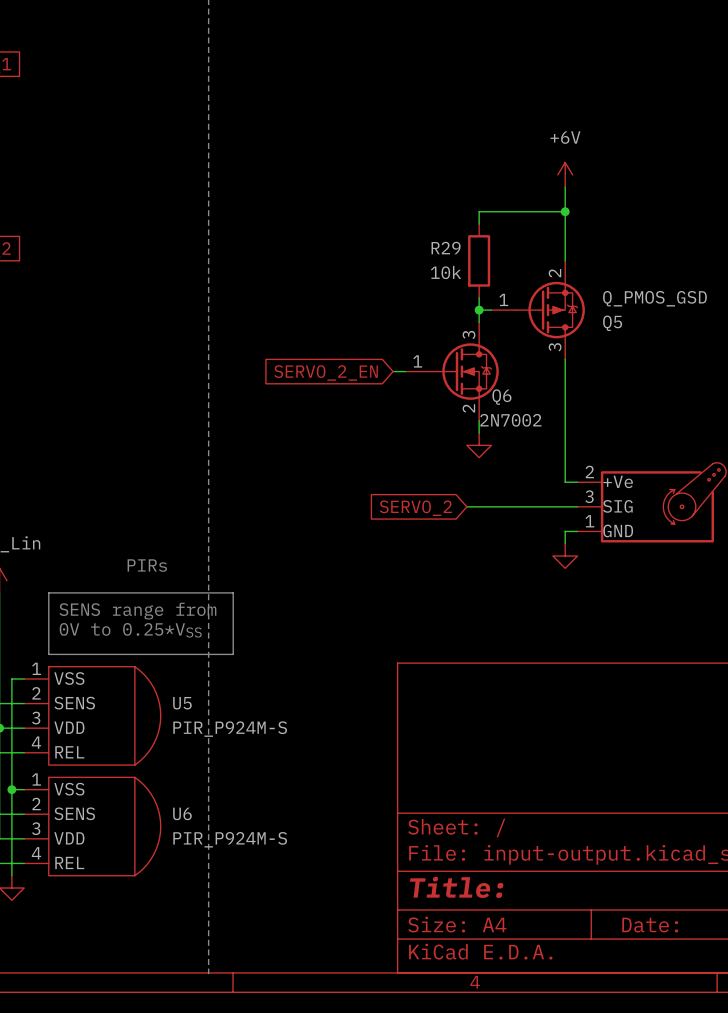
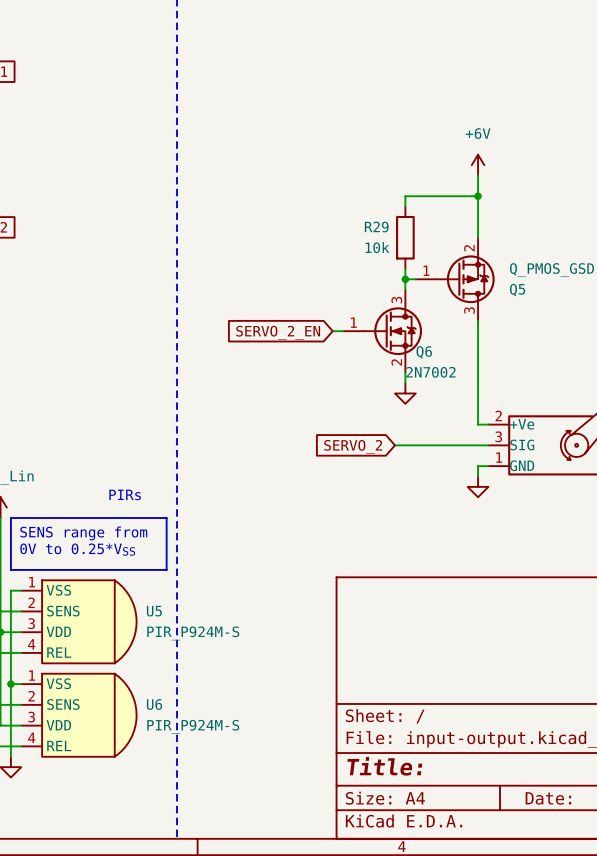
line: (48, 592) (48, 654) -> (42, 518) (10, 518) (10, 569) (42, 569)
line: (196, 592) (233, 592) (233, 654) (196, 654) -> (166, 518) (166, 569)
text position: SENS range from (137, 611) -> SENS range from (83, 533)
text position: 0V to 0.25*VSS (130, 630) -> 0V to 0.25*VSS (77, 549)

